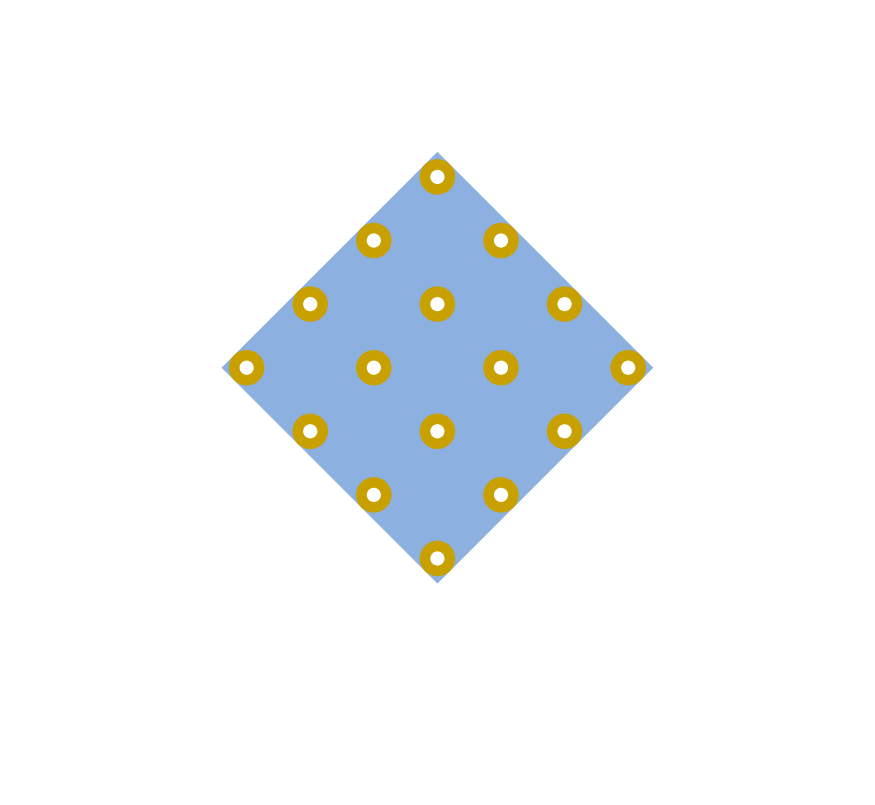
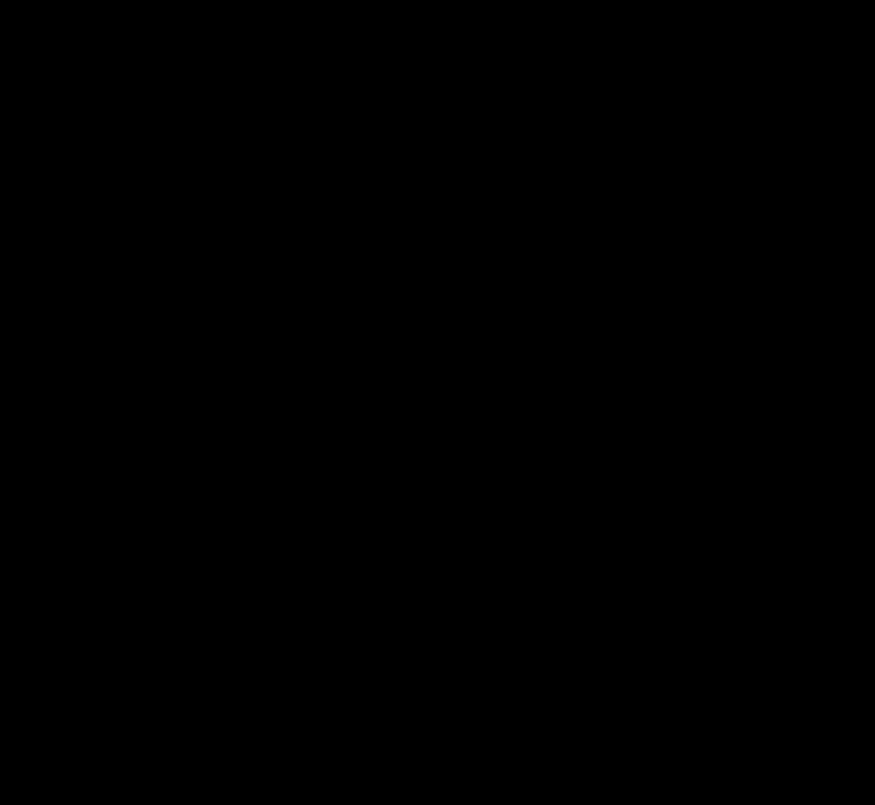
part: (437, 367) -> none

